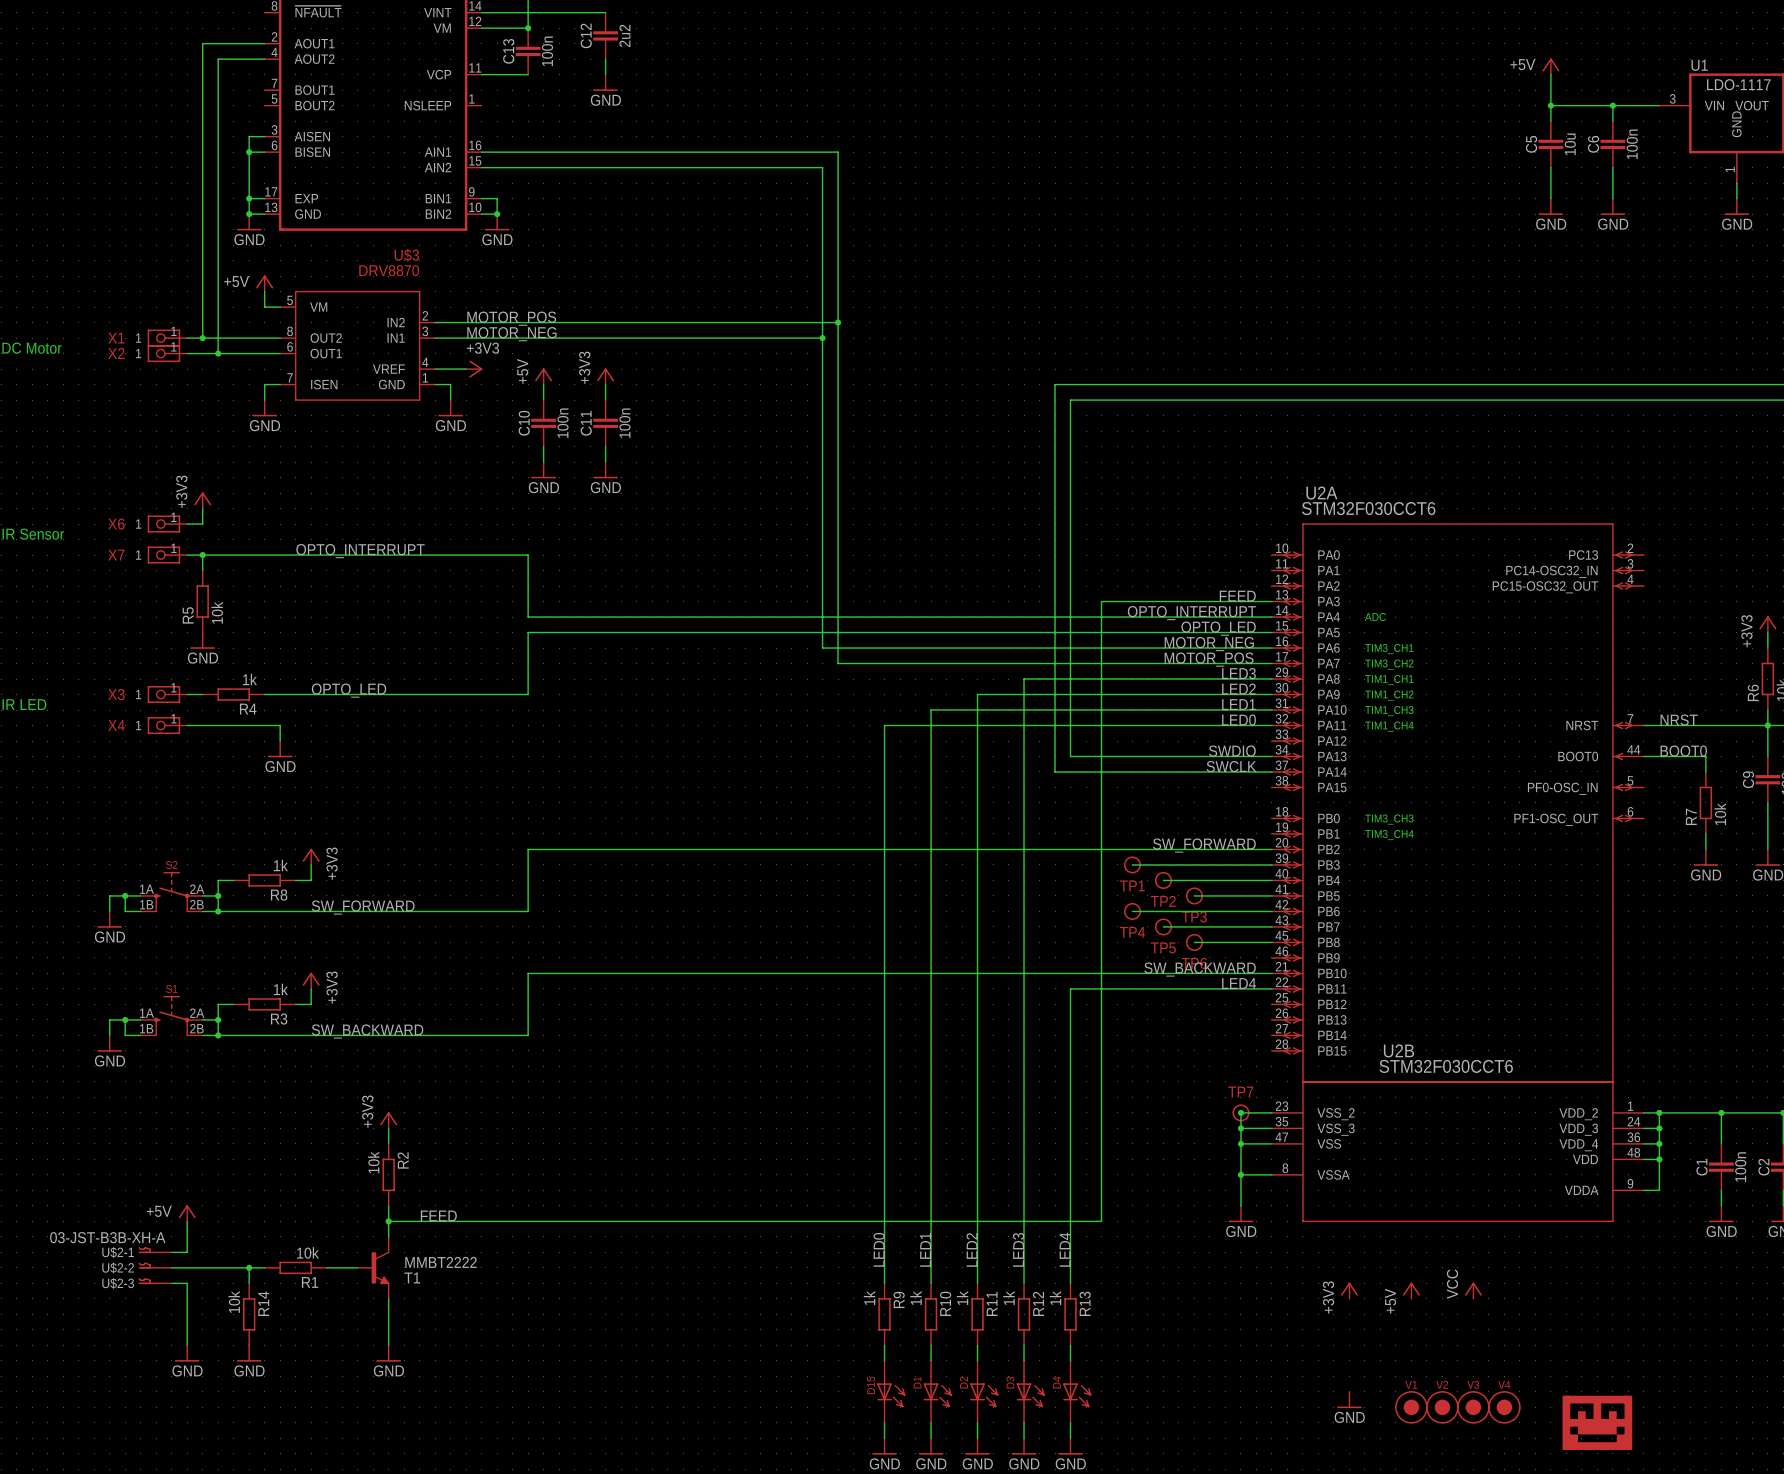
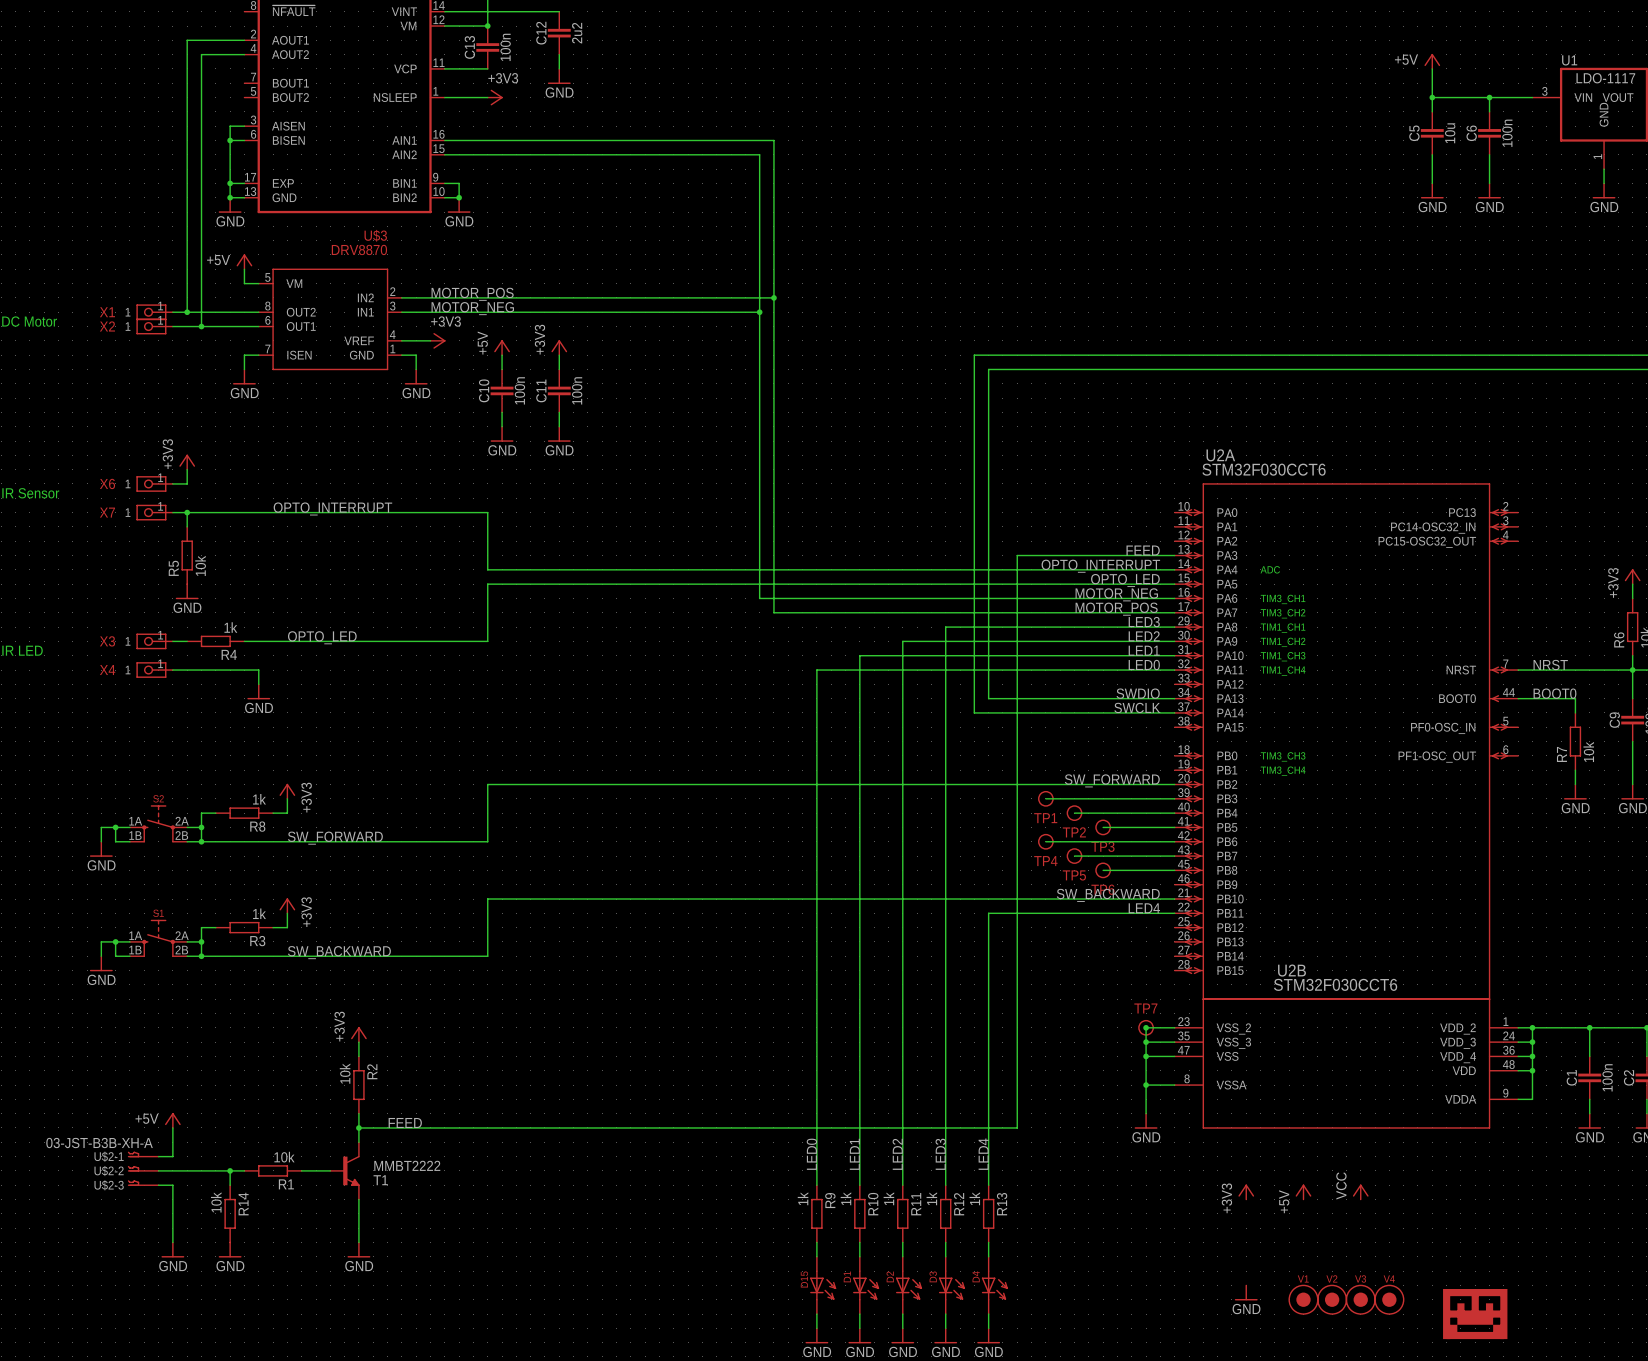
wire: none -> (444, 97) (487, 97)
power symbol: none -> +3V3 (495, 97)

